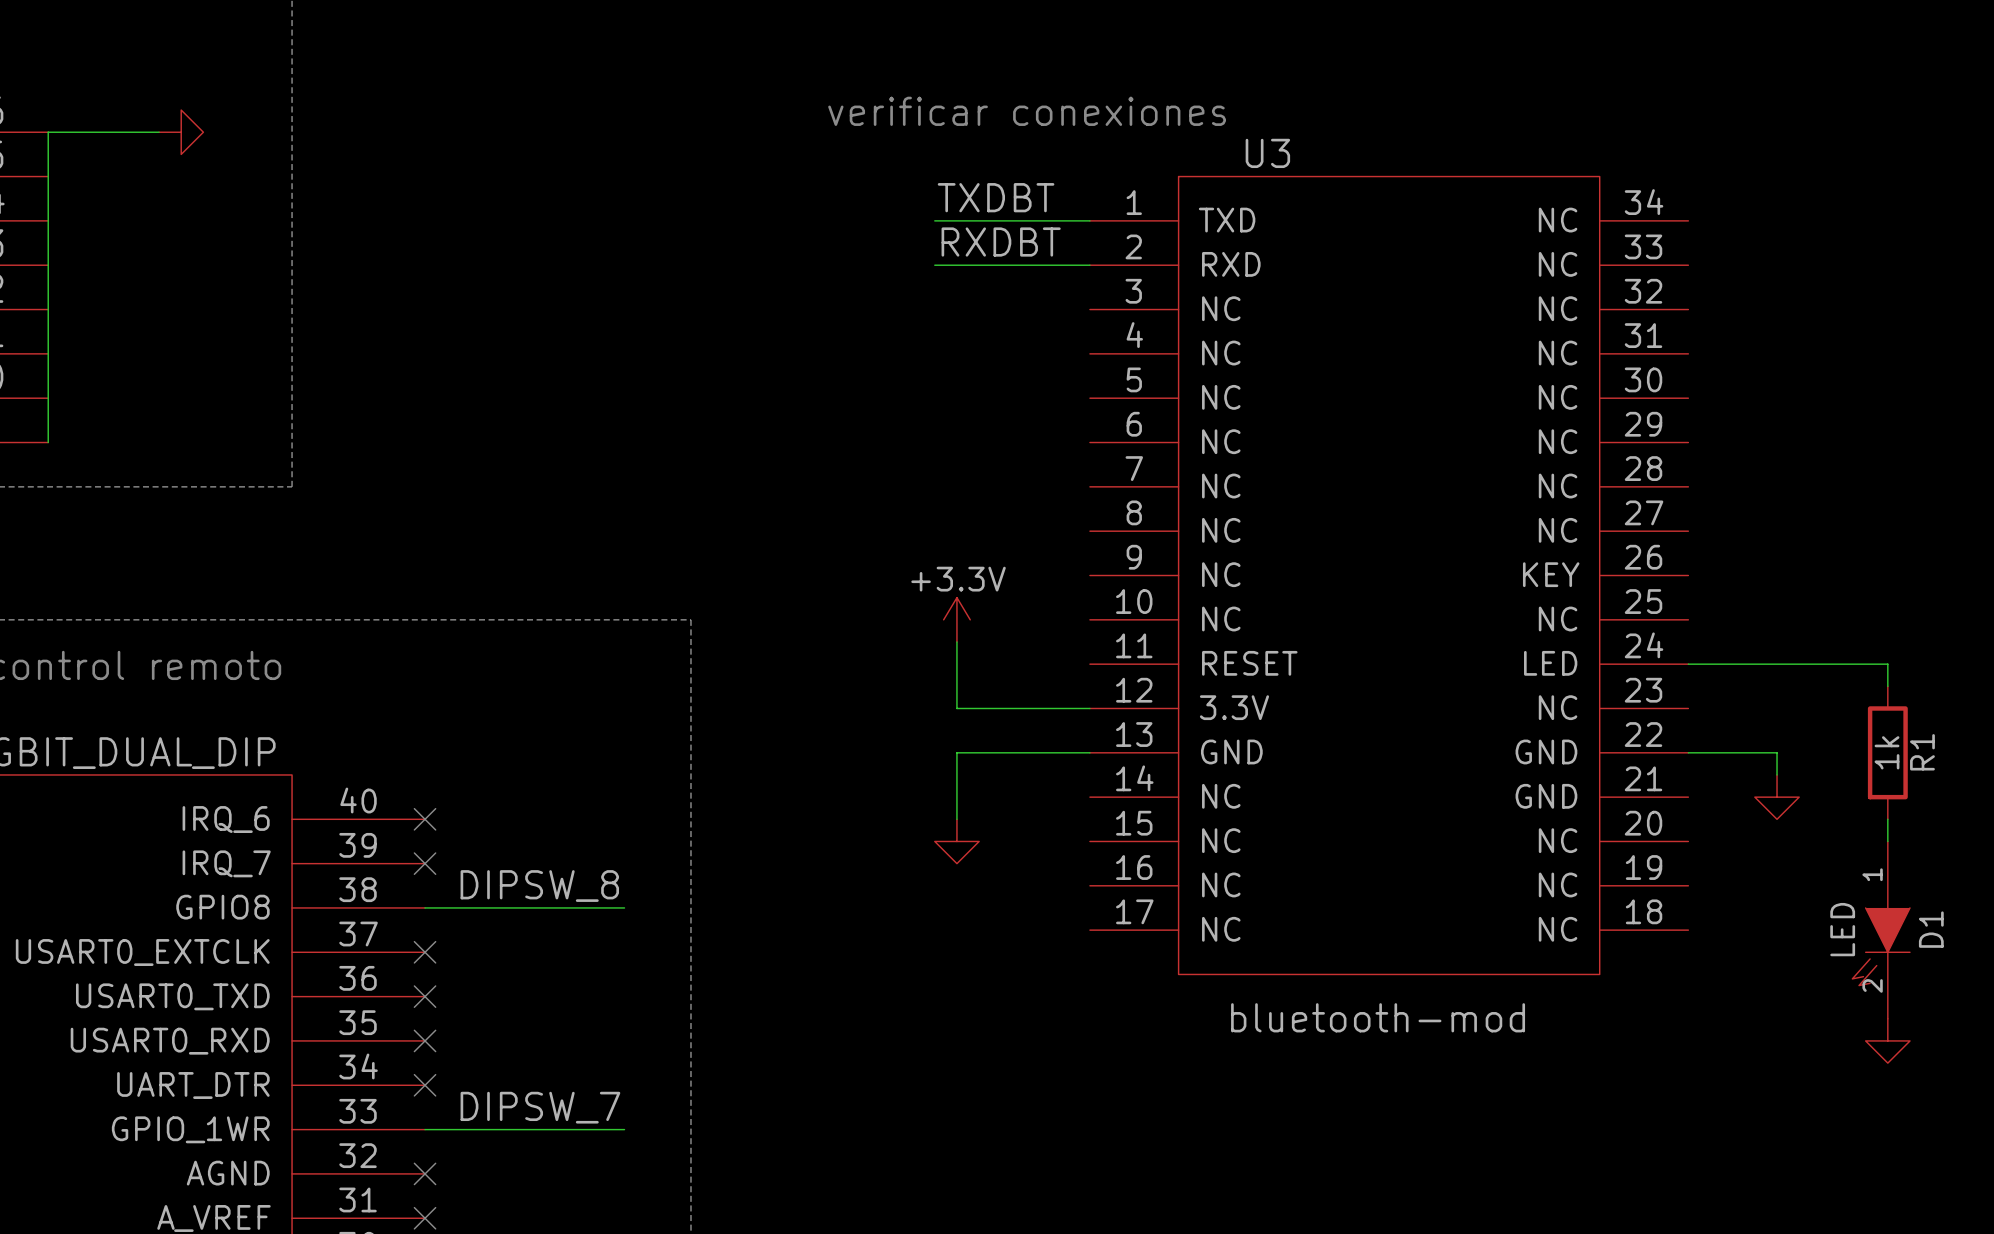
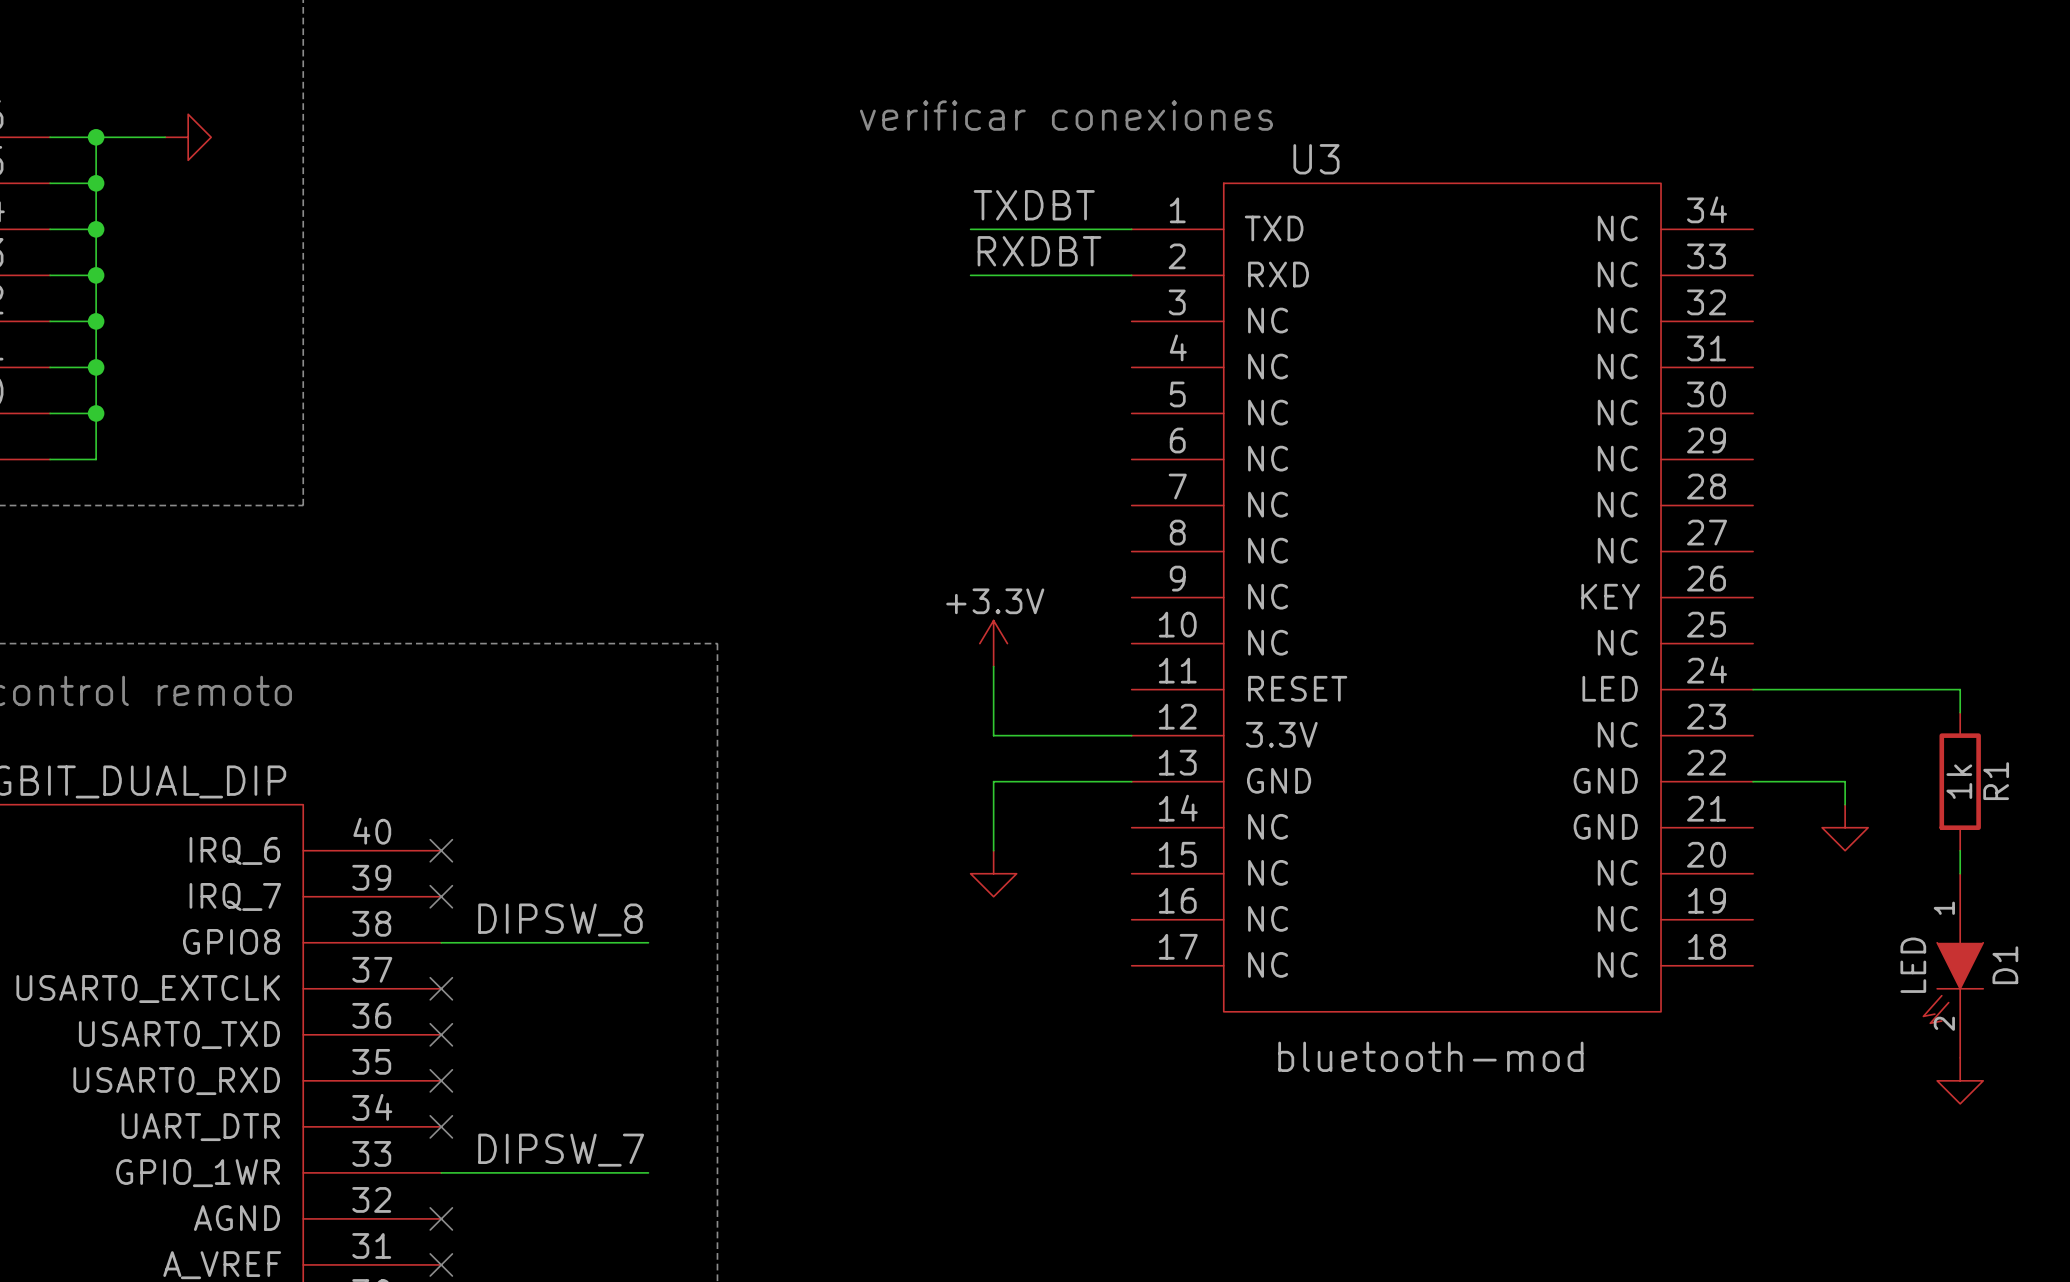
wire: (48, 132) (48, 442) -> (96, 137) (96, 459) (50, 459)
junction: none -> (96, 137)
wire: none -> (50, 183) (96, 183)
junction: none -> (96, 183)
wire: none -> (50, 229) (96, 229)
junction: none -> (96, 229)
wire: none -> (50, 275) (96, 275)
junction: none -> (96, 275)
wire: none -> (50, 321) (96, 321)
junction: none -> (96, 321)
wire: none -> (50, 367) (96, 367)
junction: none -> (96, 367)
wire: none -> (50, 413) (96, 413)
junction: none -> (96, 413)

